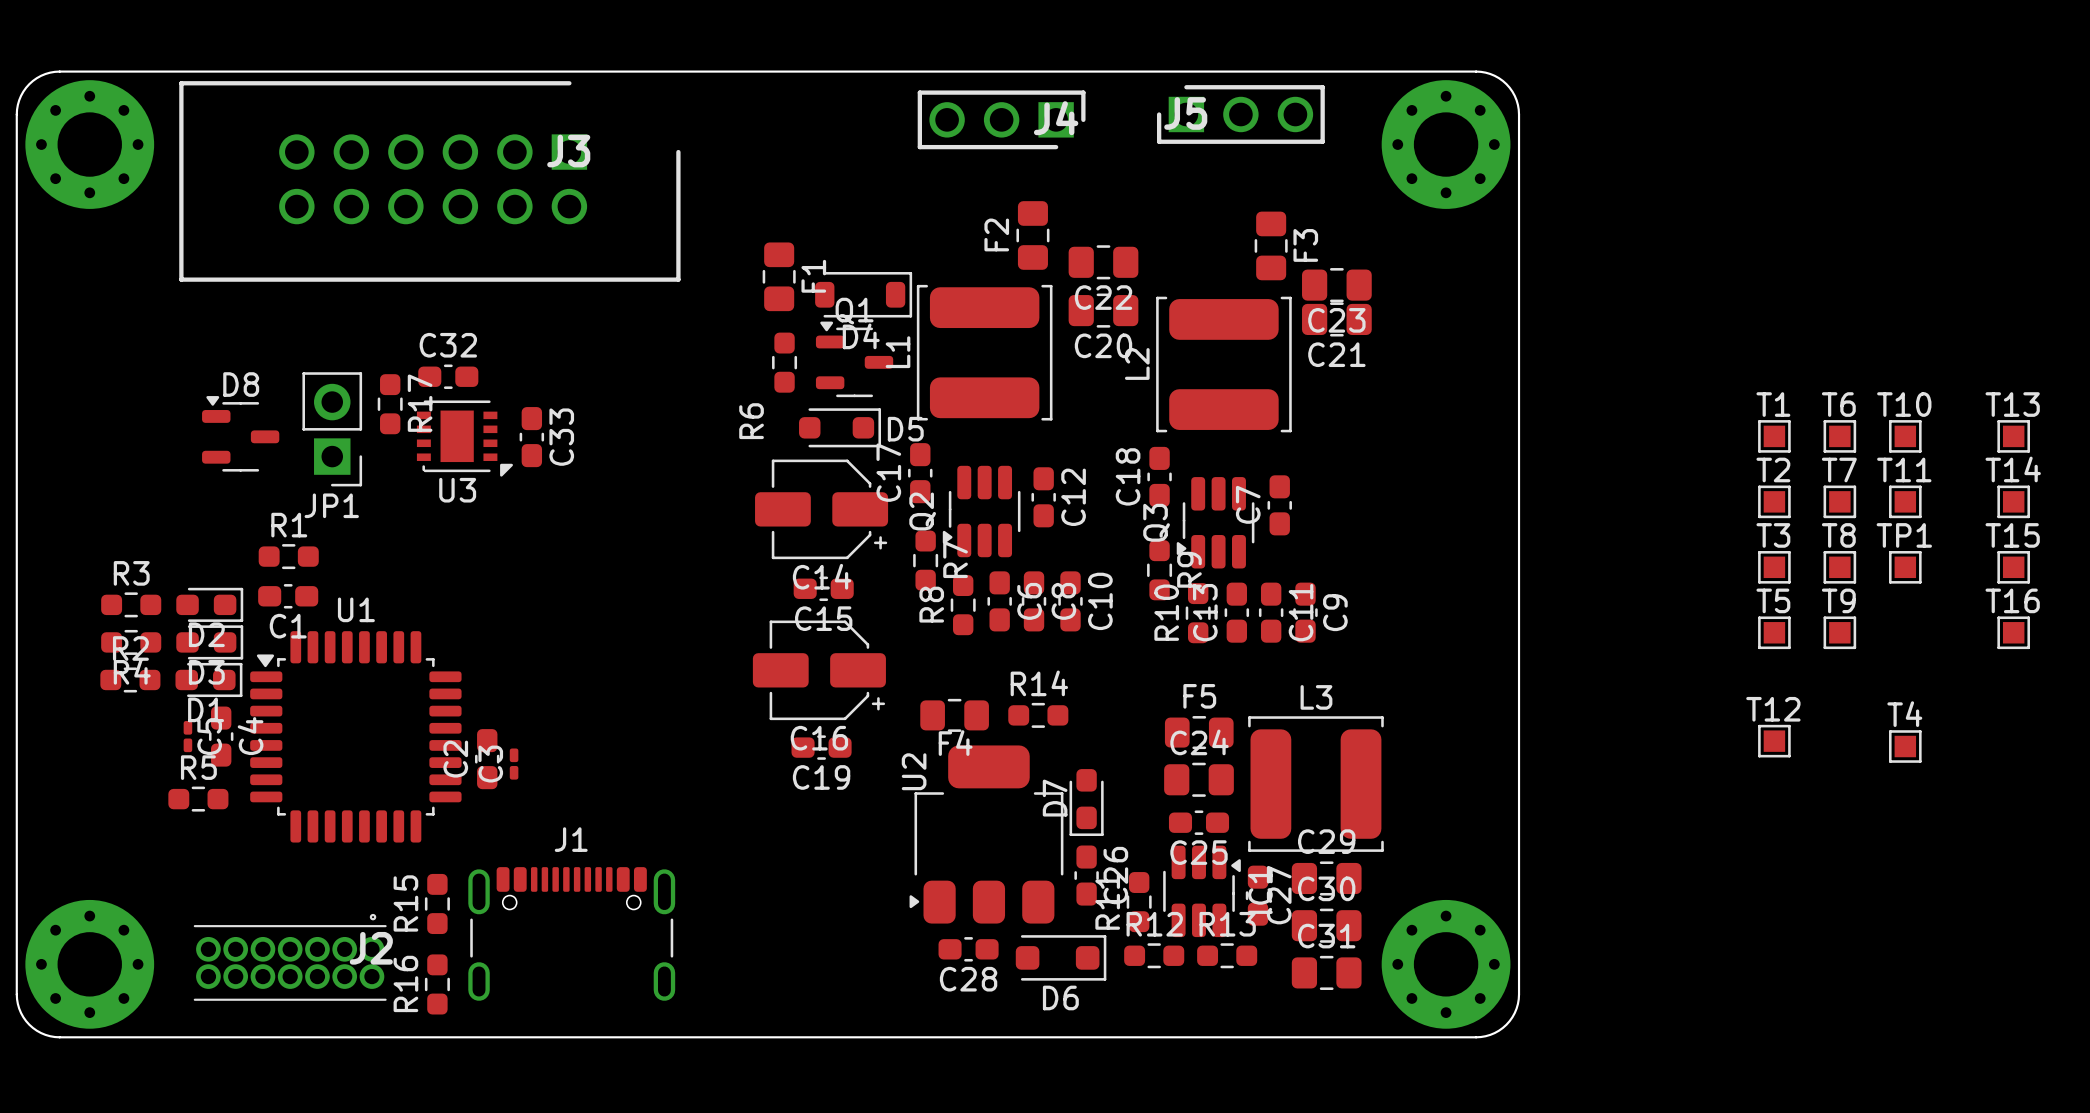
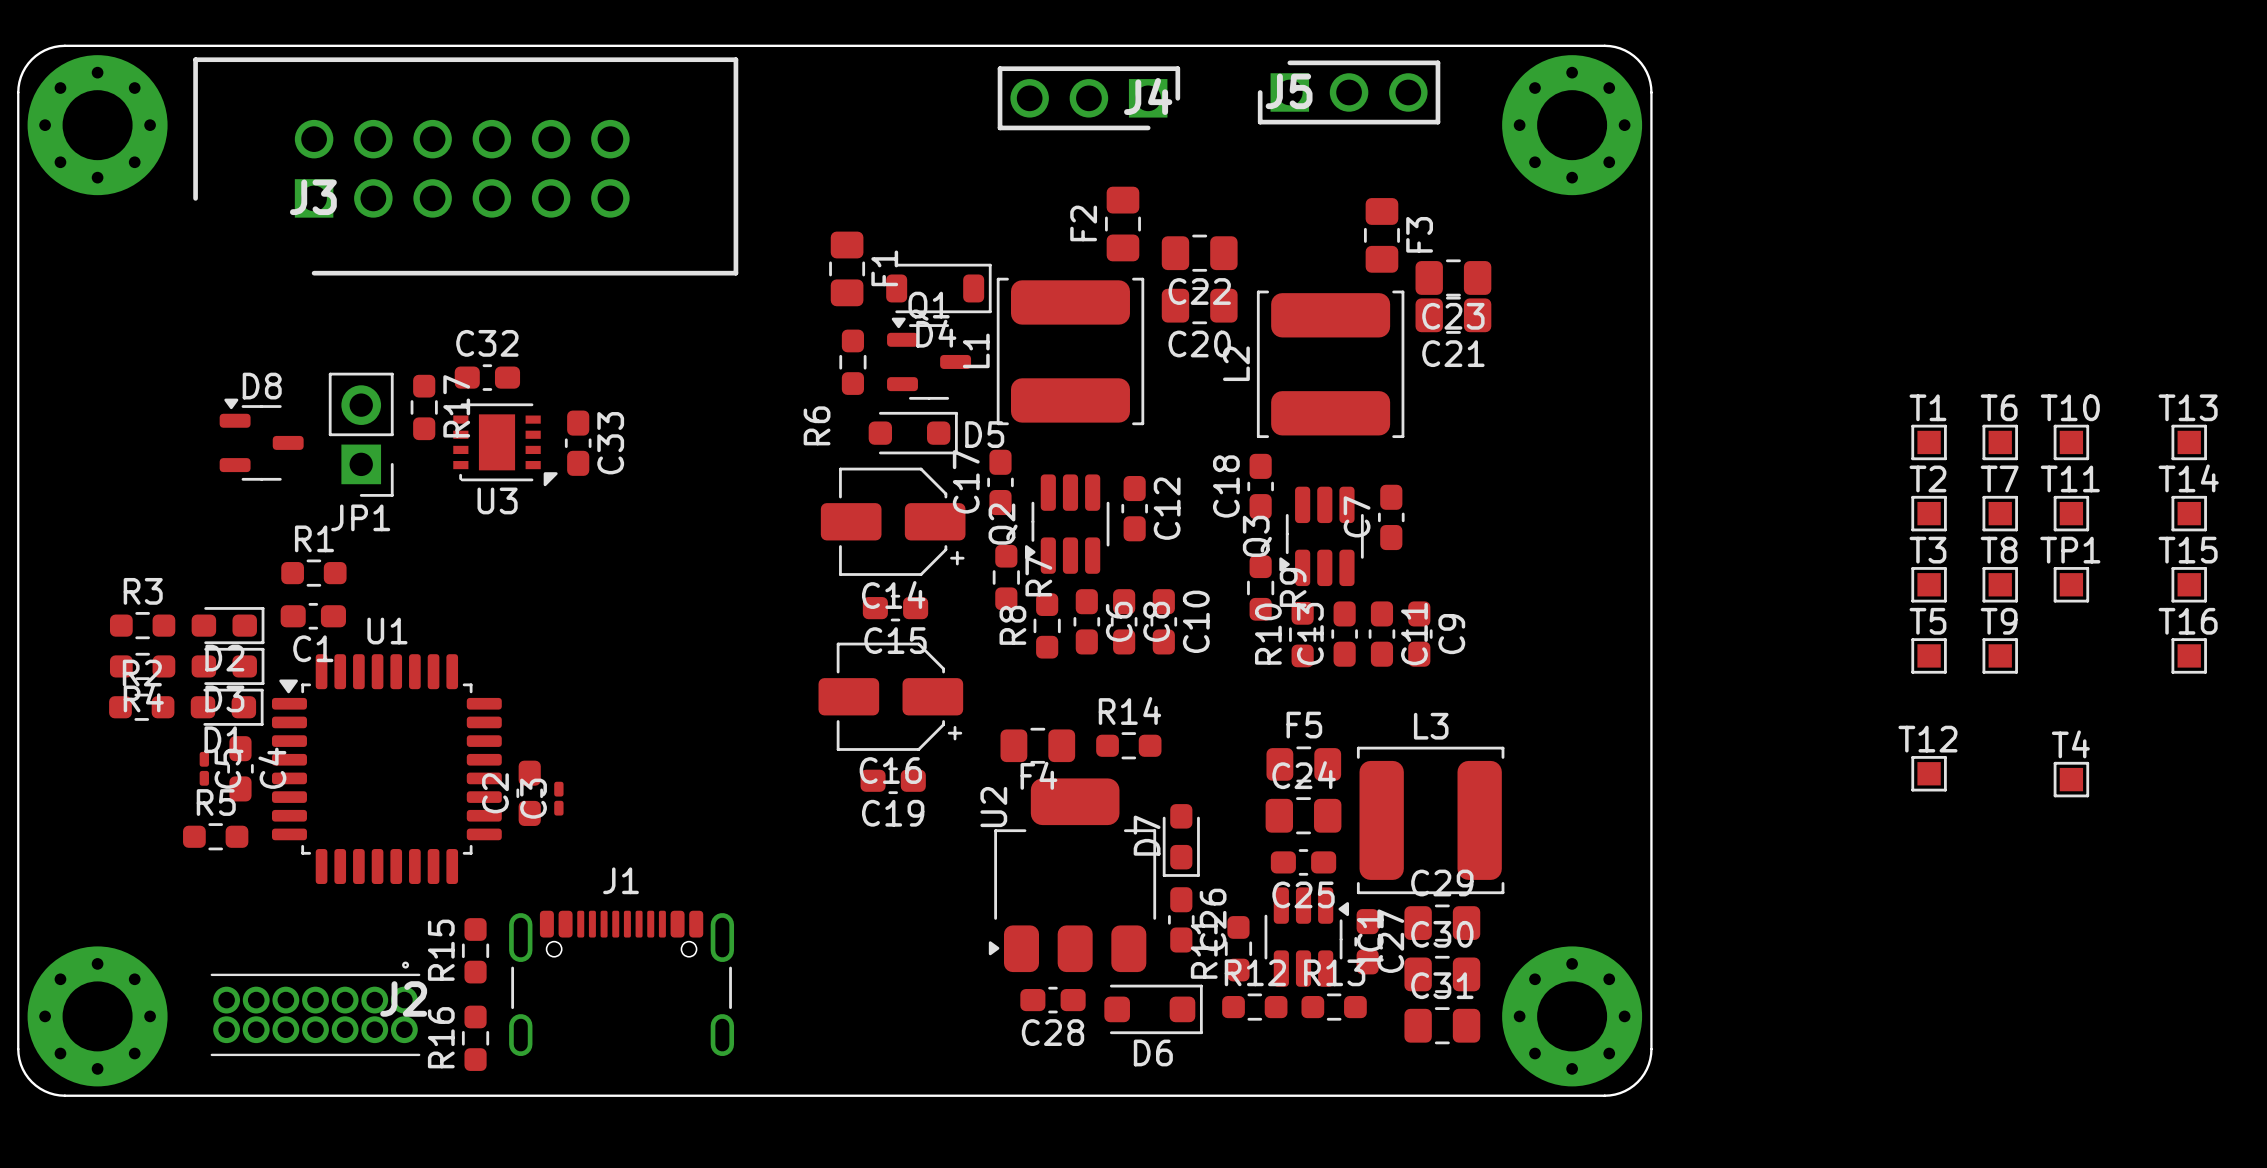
J3 rotation: 0° (429, 181) -> 180° (465, 166)

